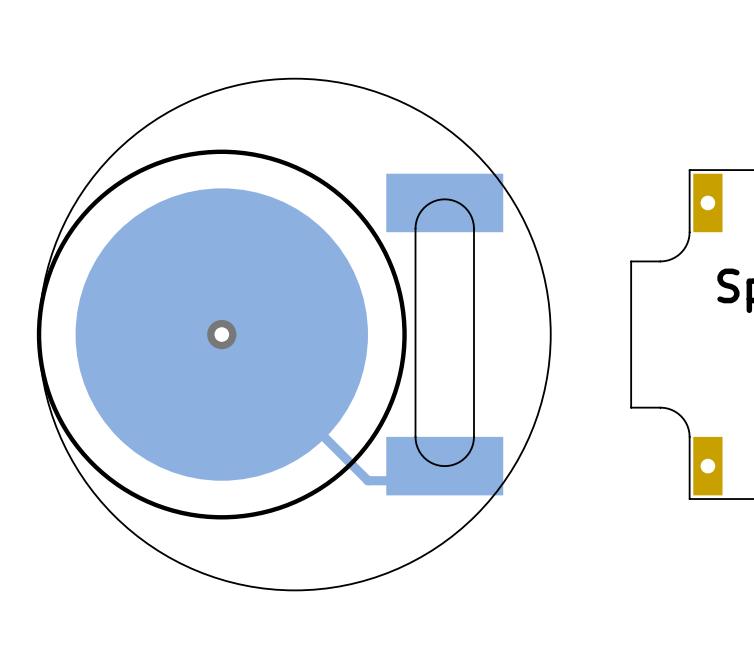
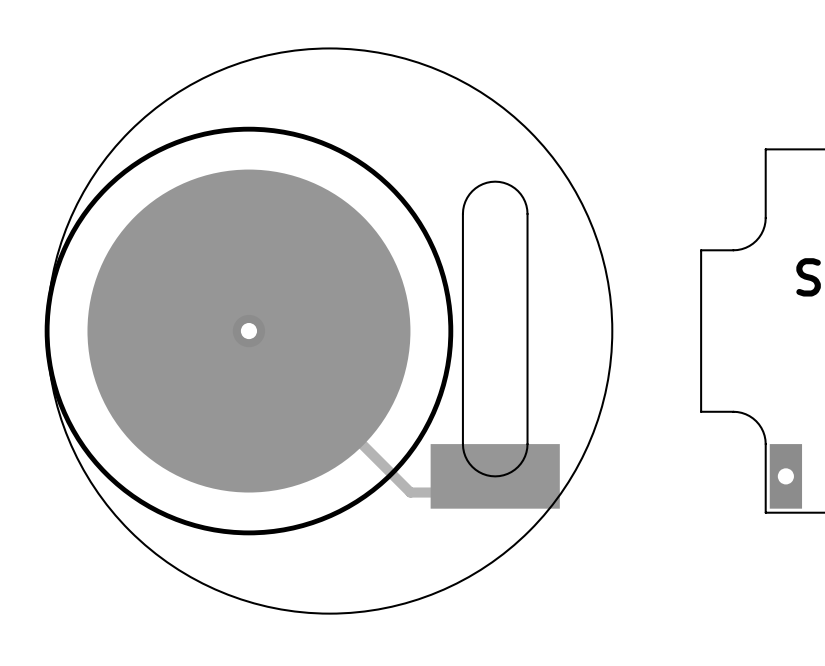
part: (444, 202) -> none
part: (707, 202) -> none

